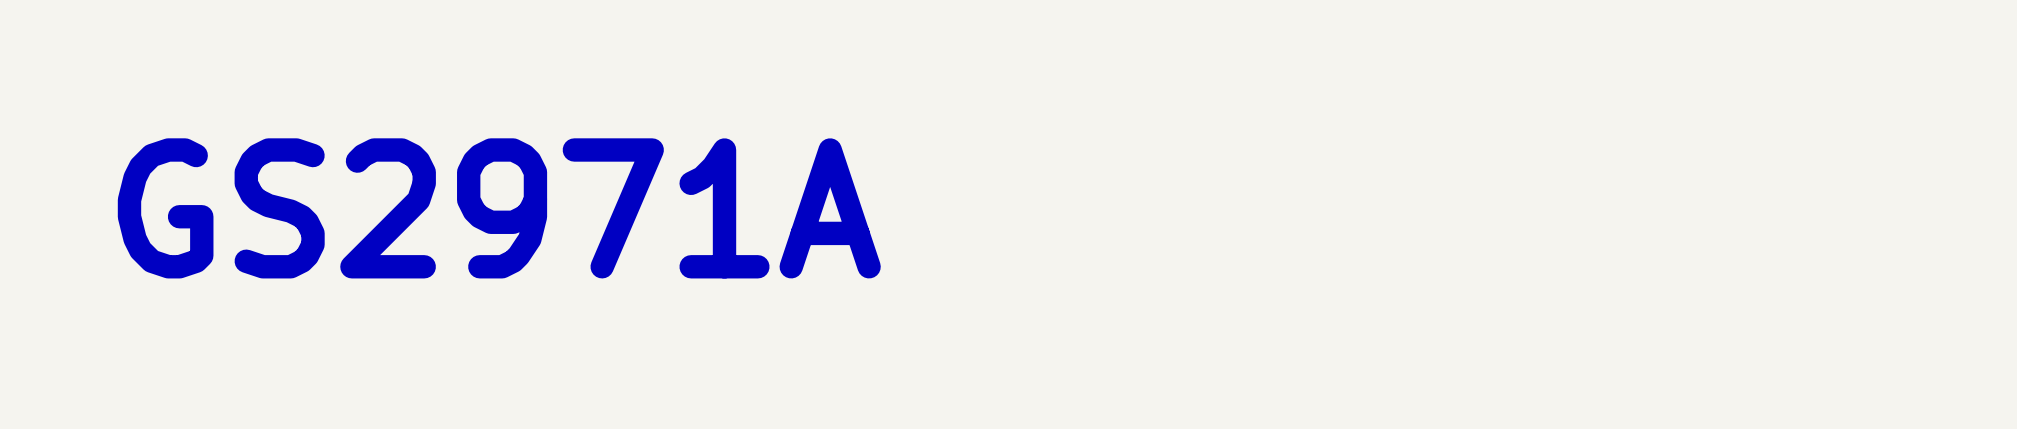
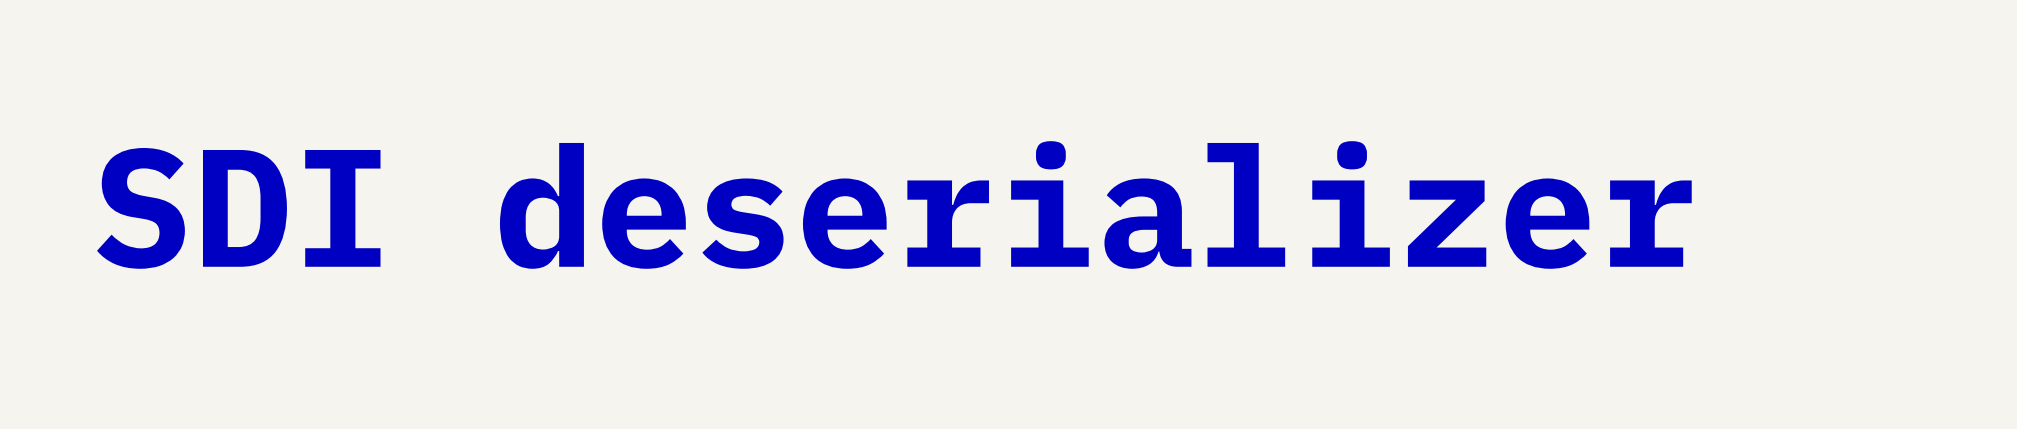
text: GS2971A (499, 208) -> SDI deserializer (894, 204)

